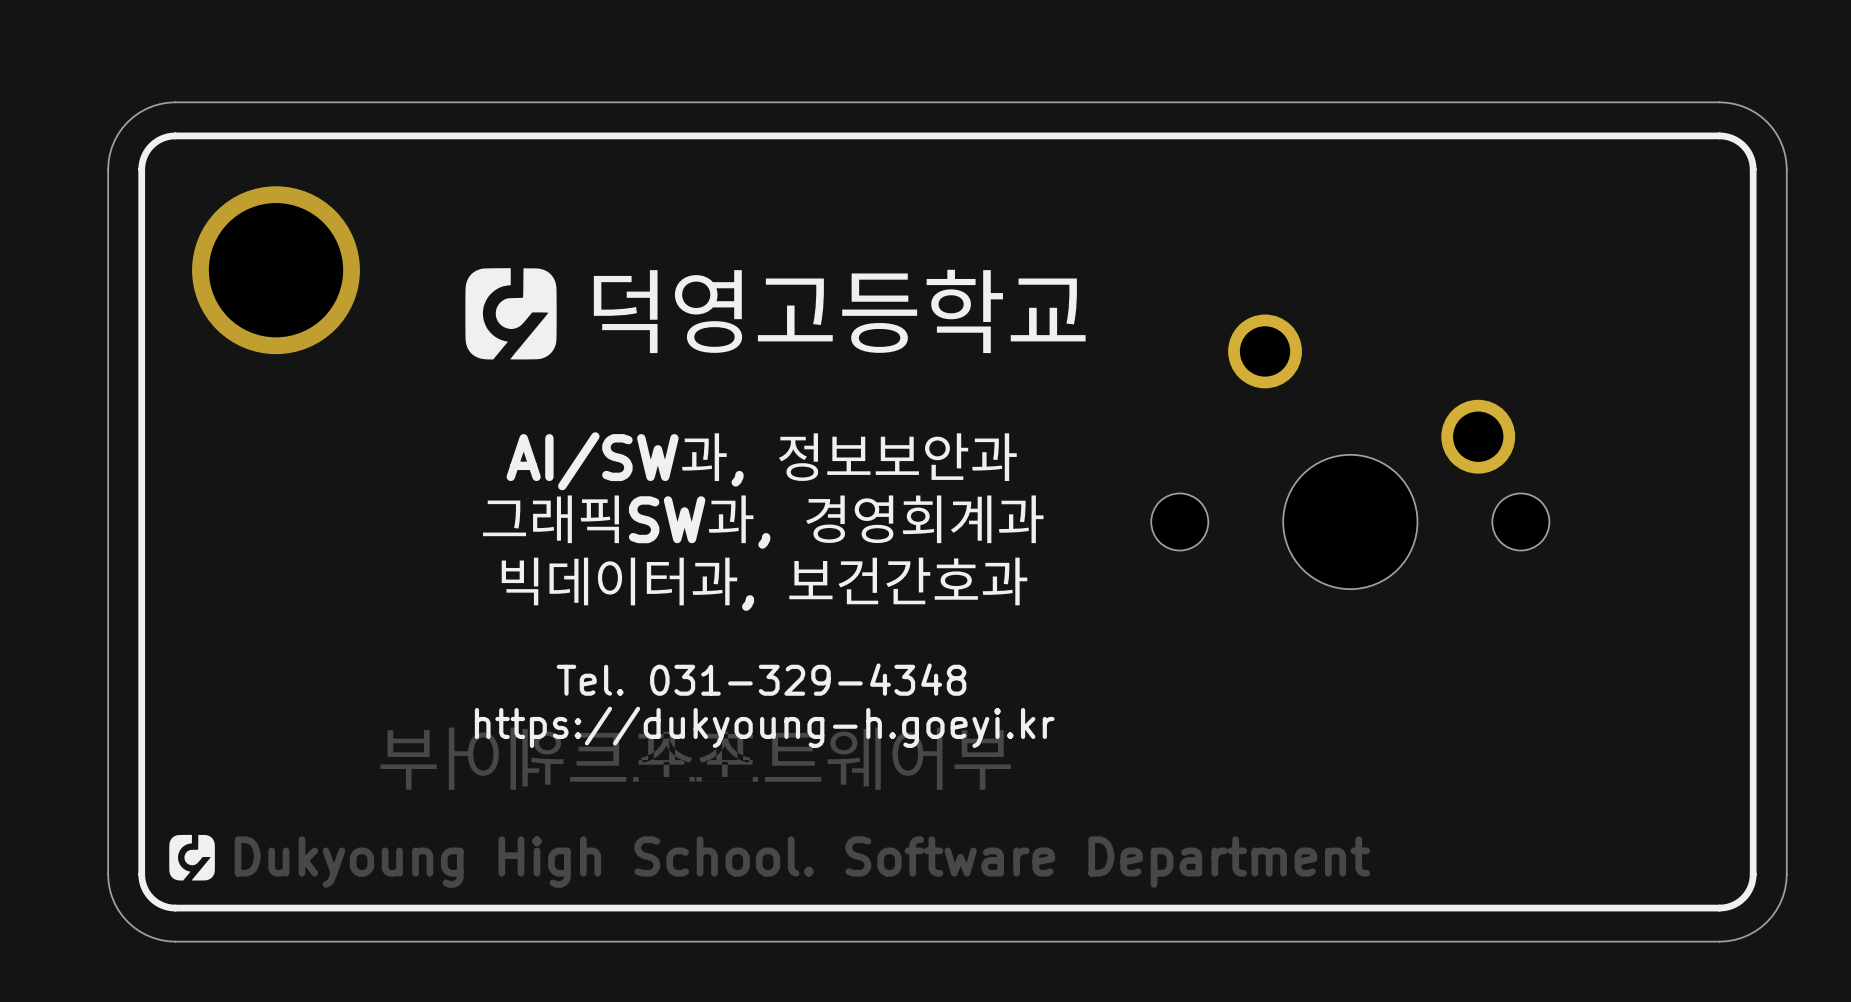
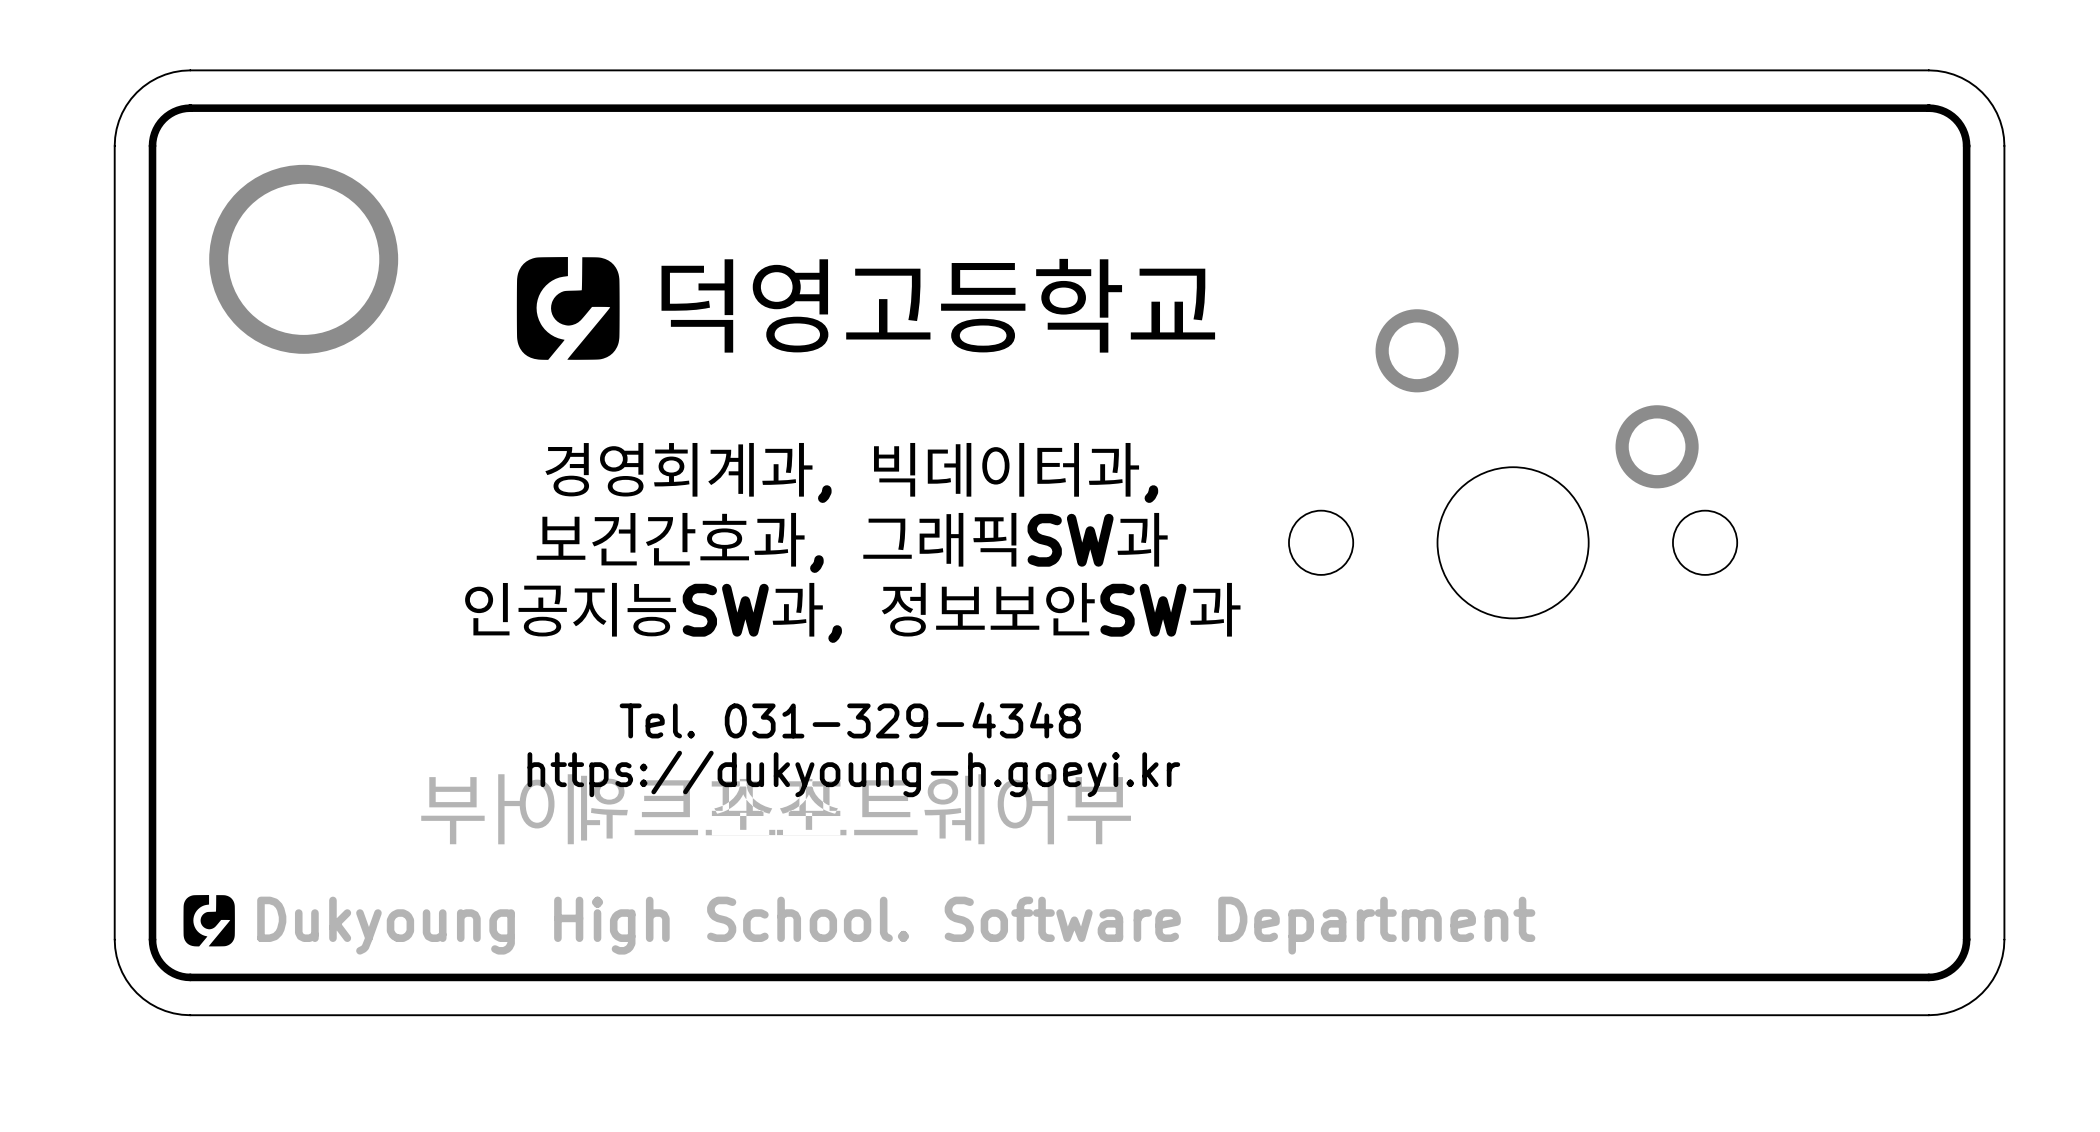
text: AI/SW과, 정보보안과 (763, 459) -> 경영회계과, 빅데이터과, (849, 470)
text: 그래픽SW과, 경영회계과 (763, 520) -> 보건간호과, 그래픽SW과 (852, 540)
text: 빅데이터과, 보건간호과 (764, 582) -> 인공지능SW과, 정보보안SW과 (852, 610)

